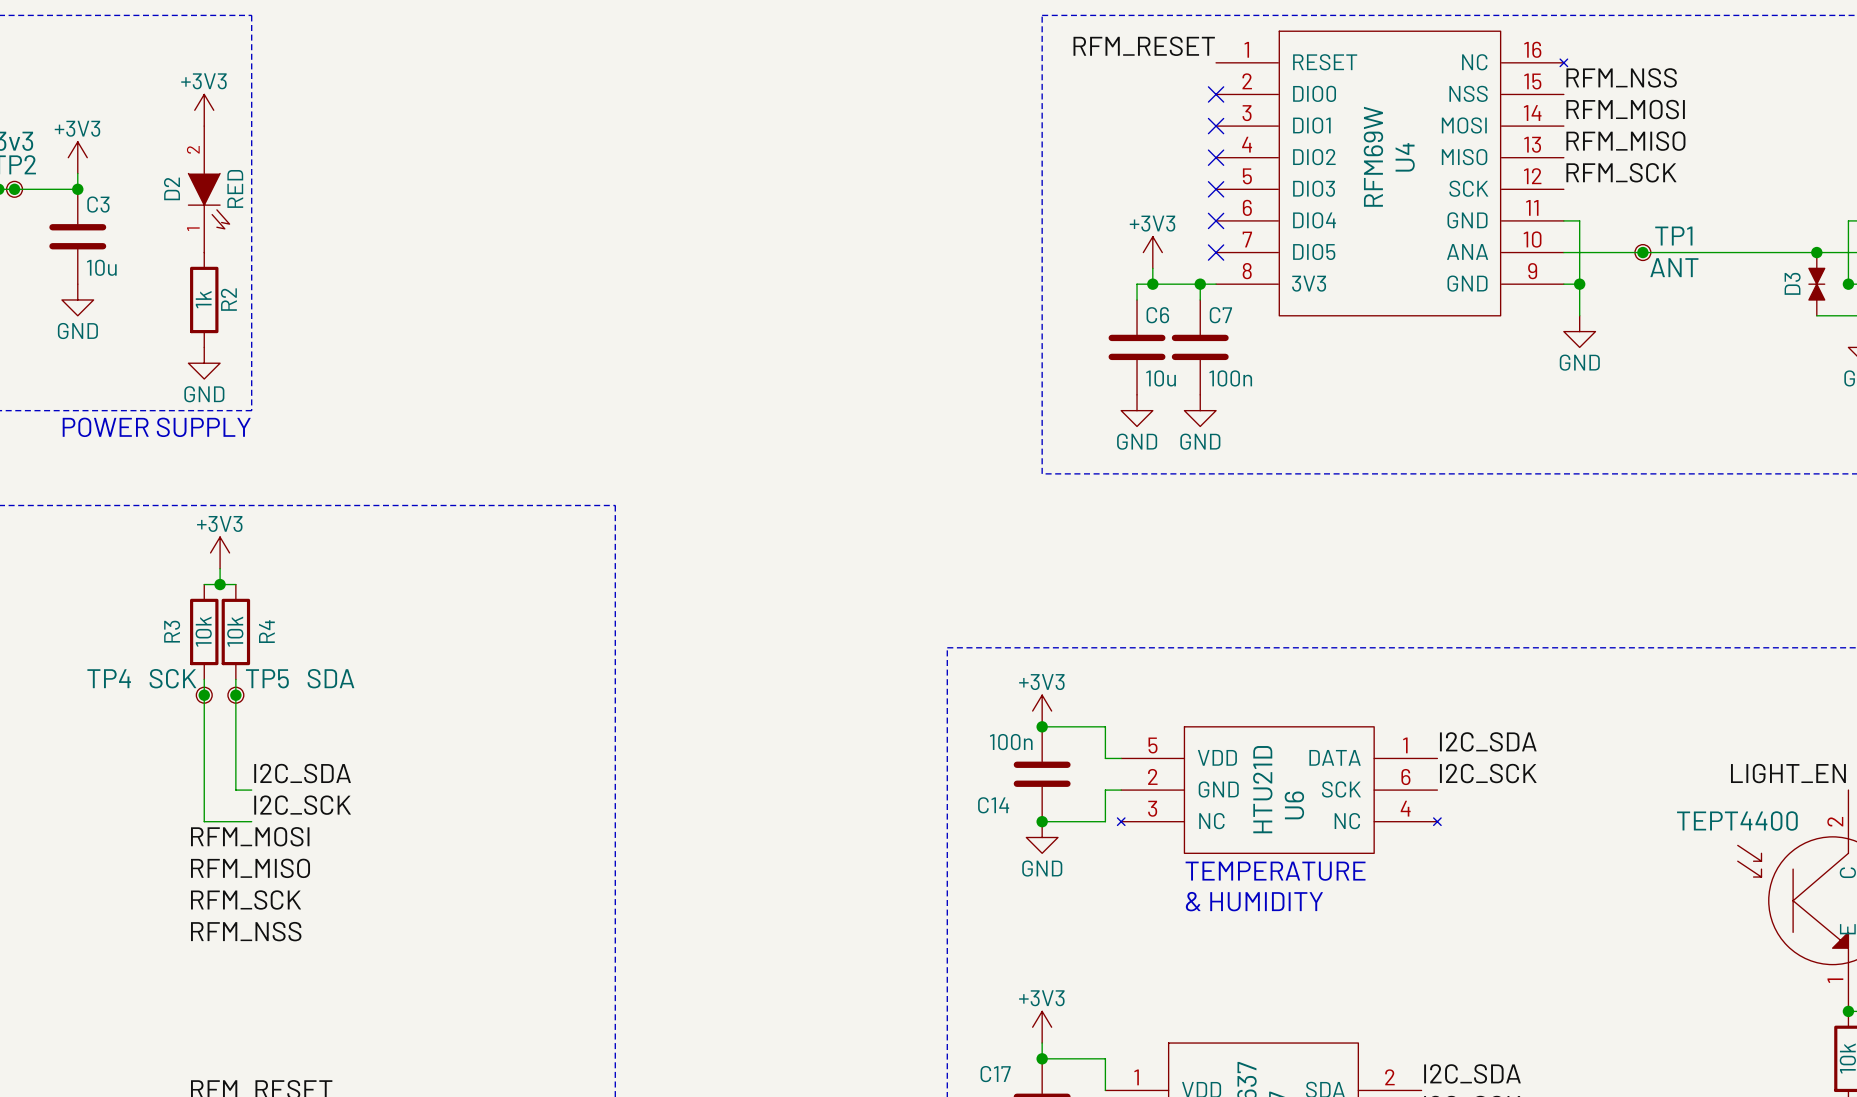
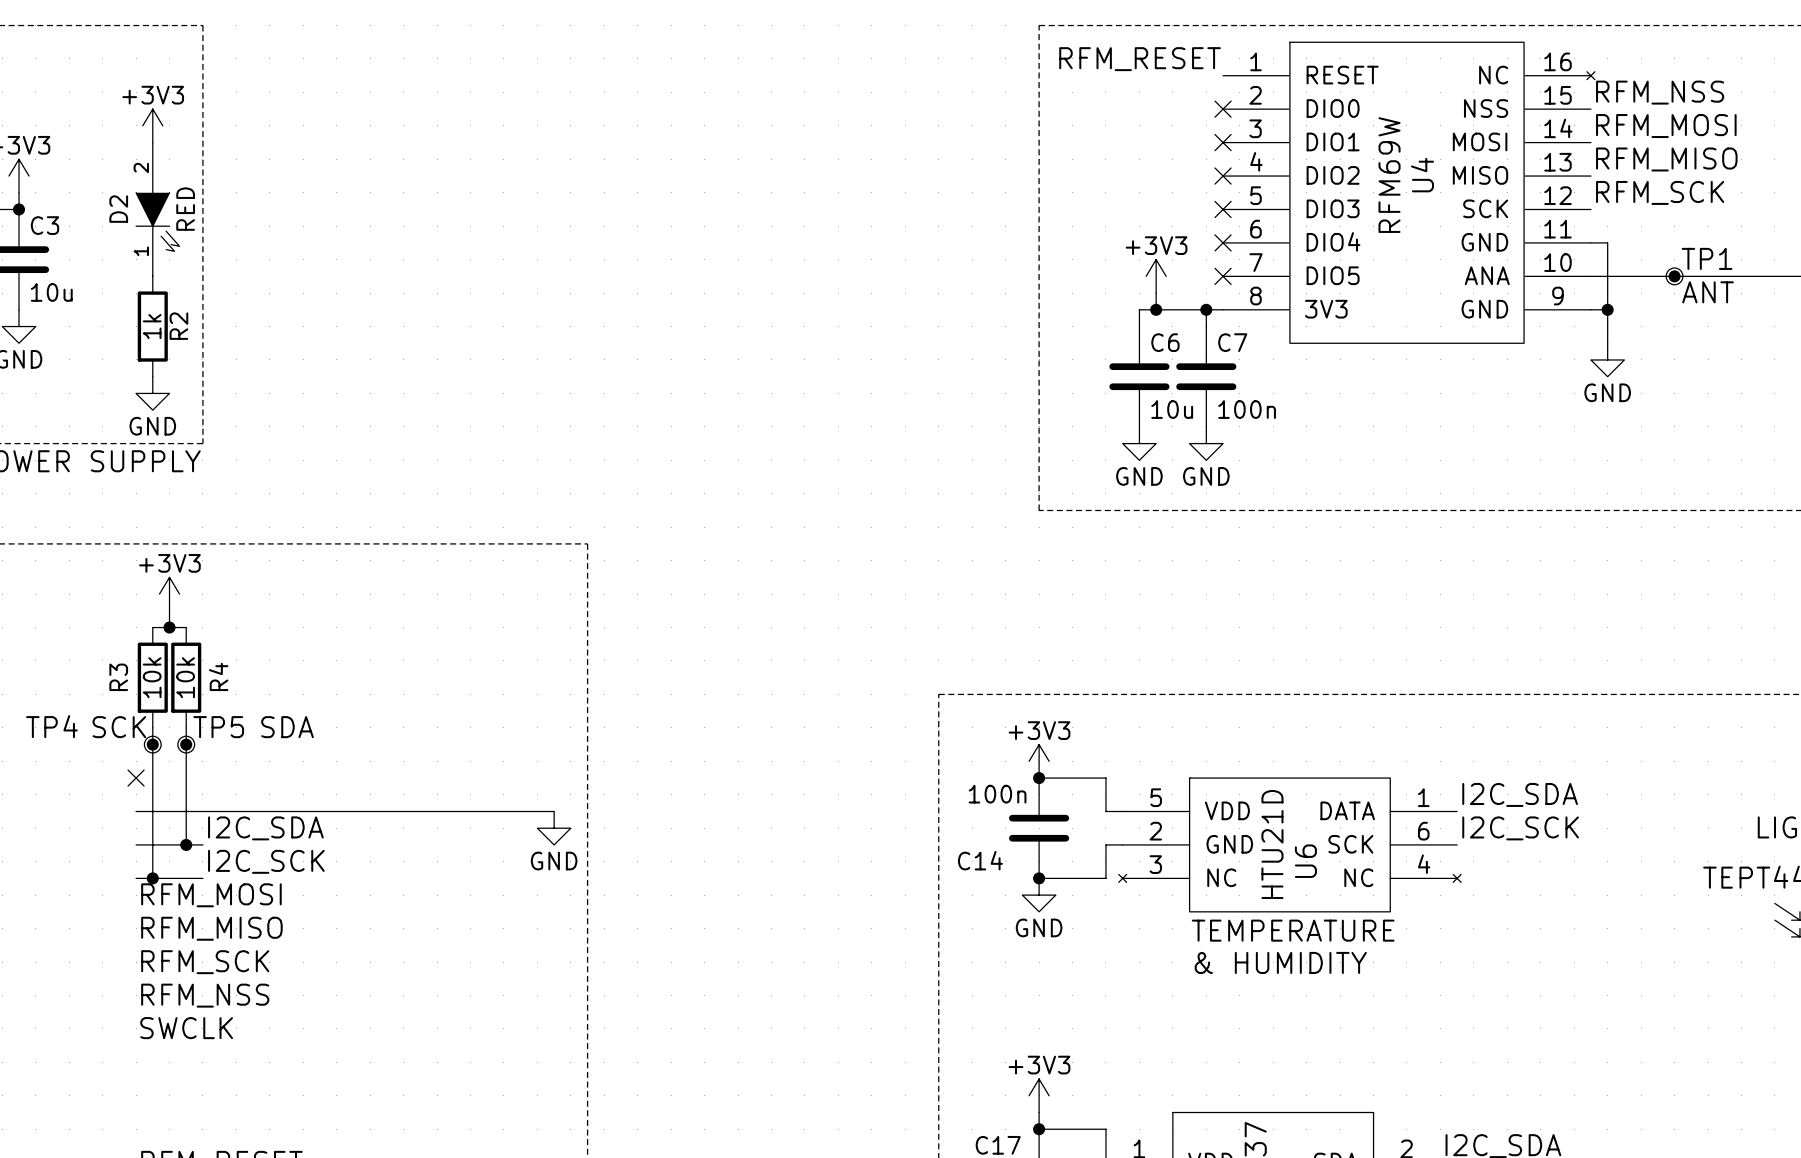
no-connect mark: none -> (136, 778)
wire: none -> (136, 811) (554, 811)
power symbol: none -> GND (554, 828)
wire: none -> (136, 844) (186, 844)
junction: none -> (186, 844)
wire: none -> (136, 878) (152, 878)
junction: none -> (152, 878)
label: none -> SWCLK (186, 1028)

